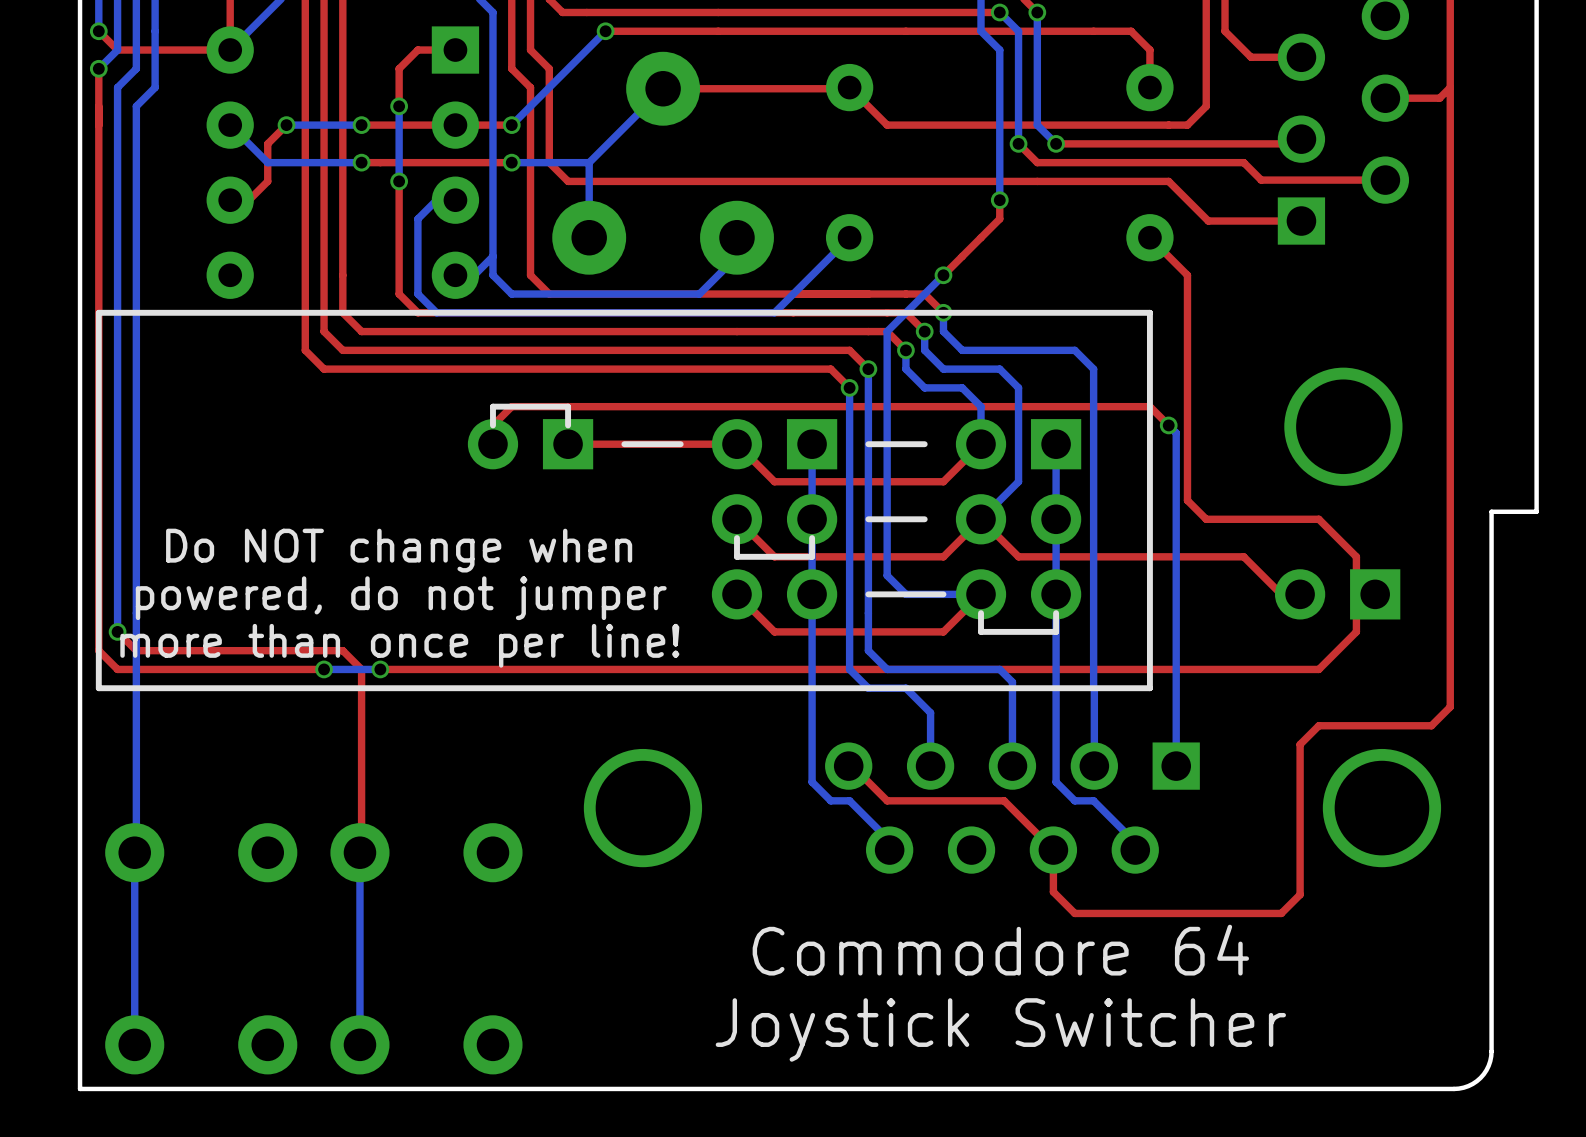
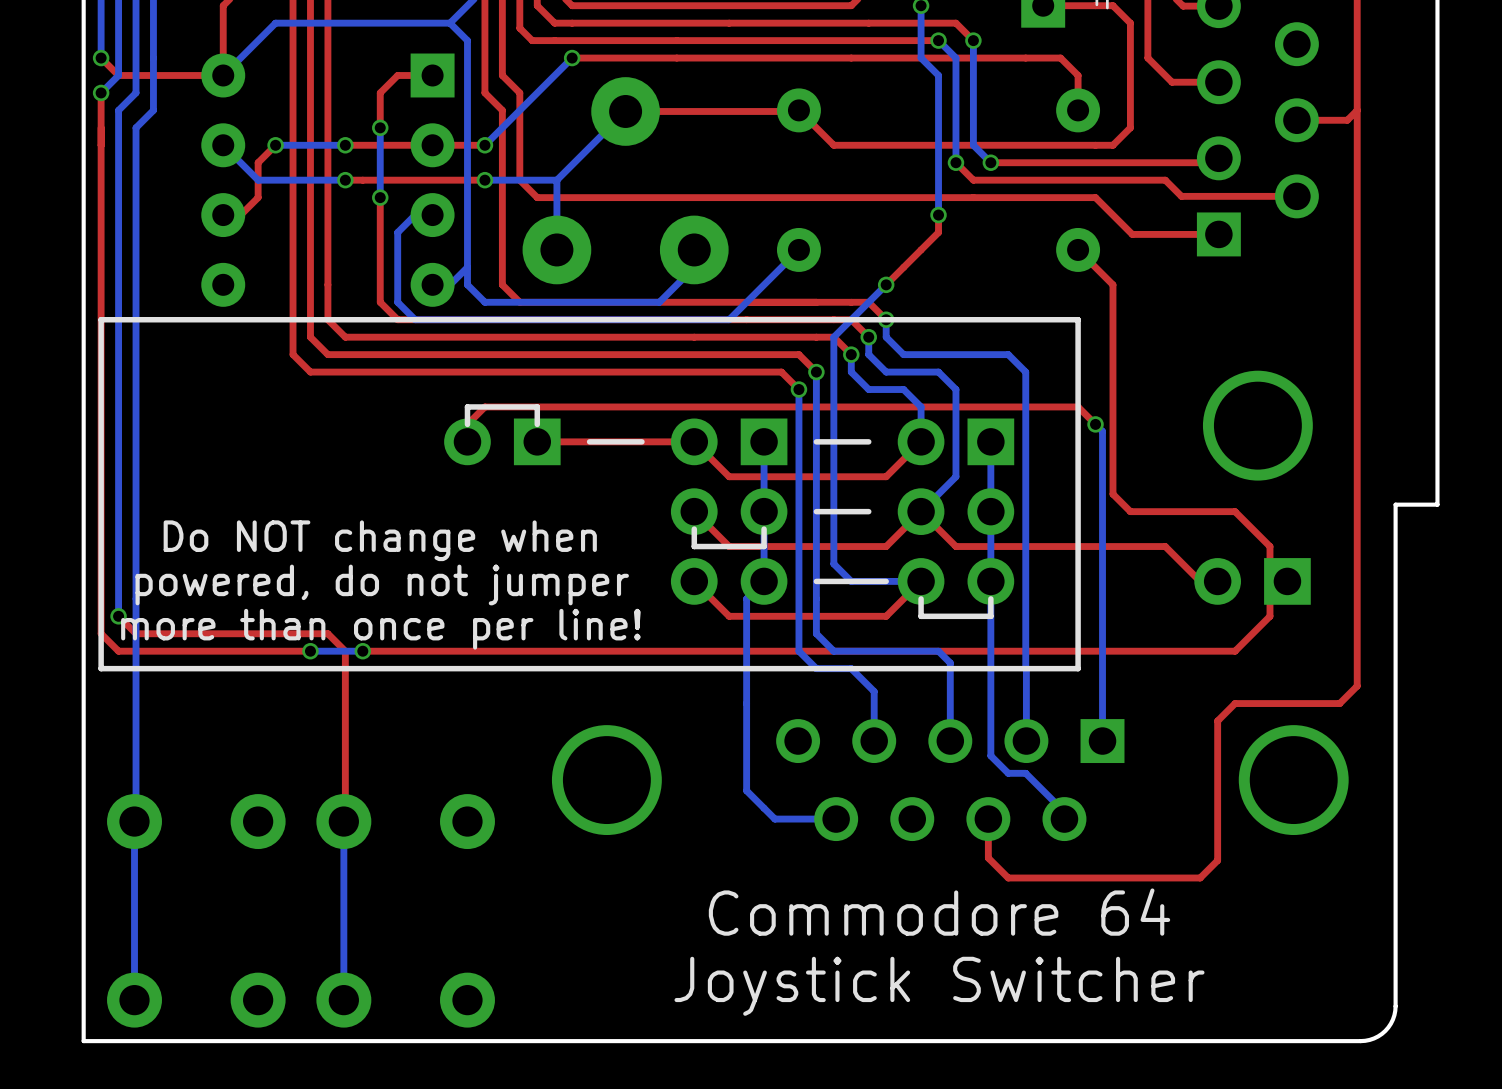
bottom track: (812, 594) (812, 782) (830, 800) (849, 800) (889, 840) -> (764, 581) (746, 598) (746, 790) (774, 819) (836, 819)
top track: (848, 766) (852, 766) (887, 800) (1004, 800) (1053, 850) -> none

